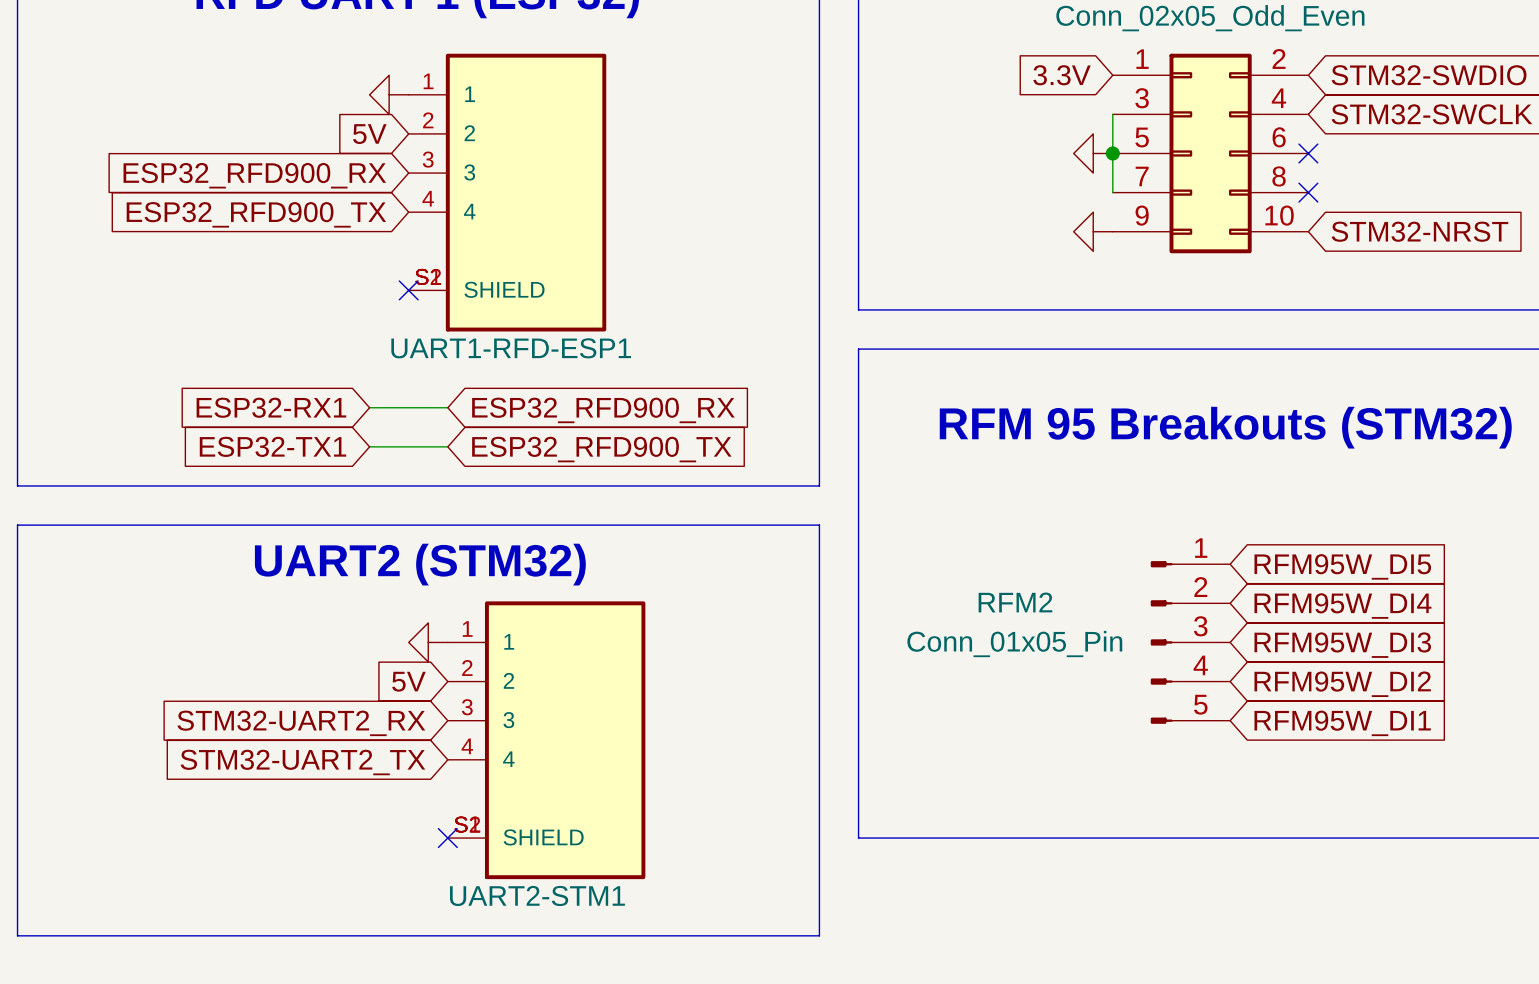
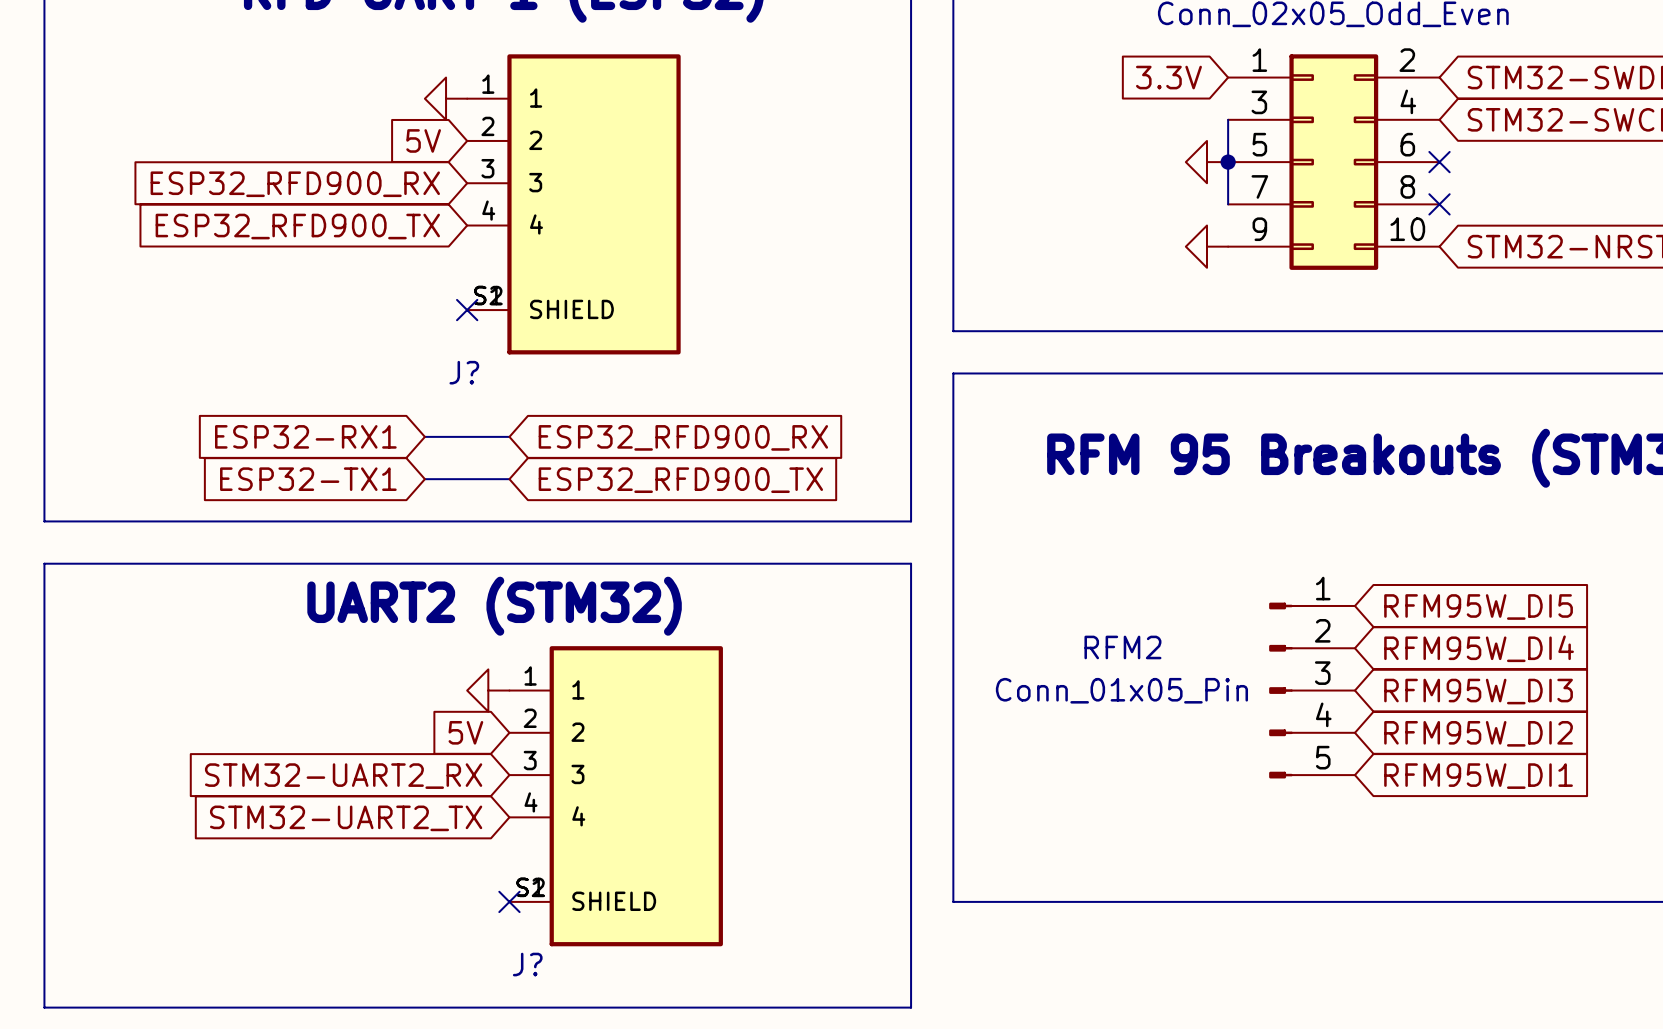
UART1-RFD-ESP1 name: UART1-RFD-ESP1 (511, 348) -> J? (464, 372)
UART2-STM1 name: UART2-STM1 (537, 895) -> J? (527, 964)

